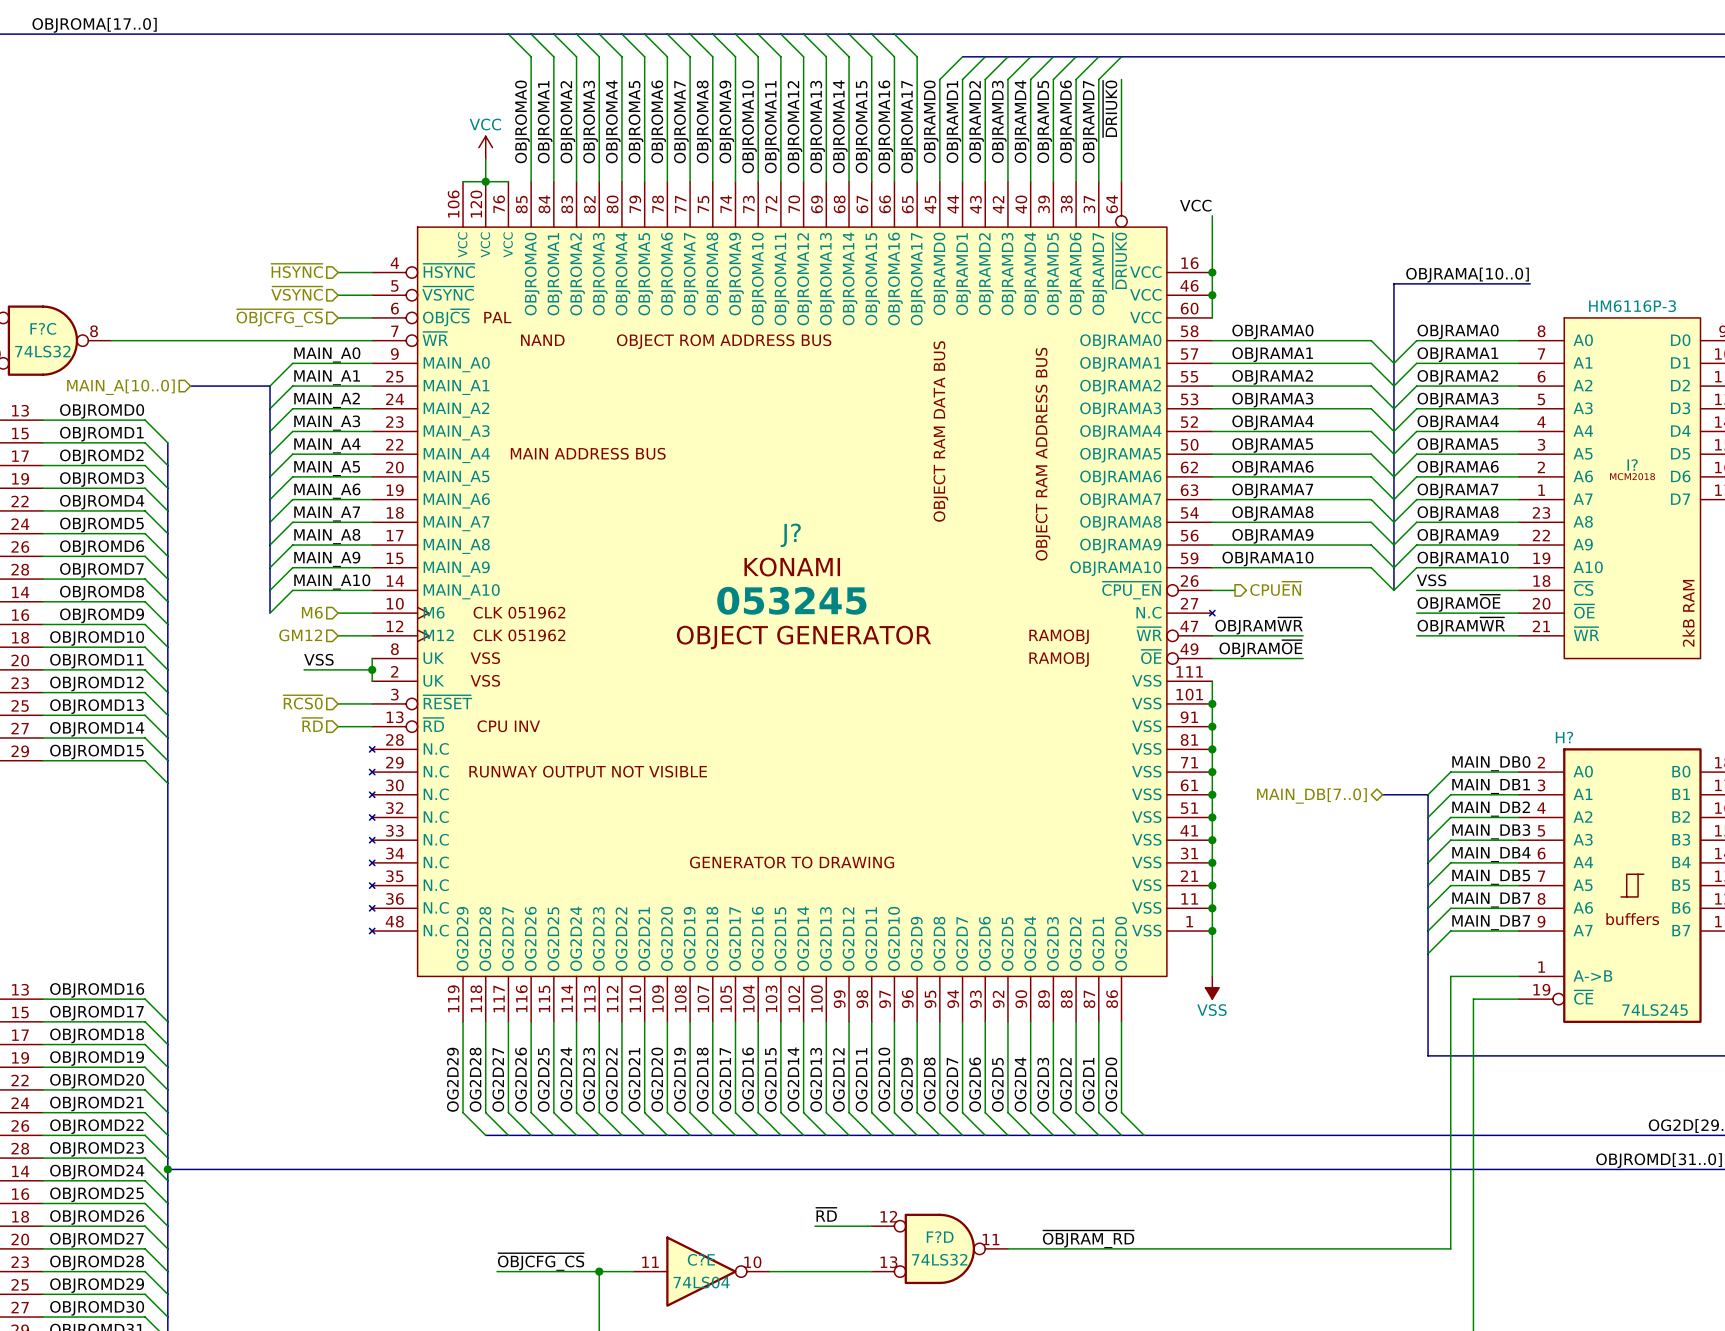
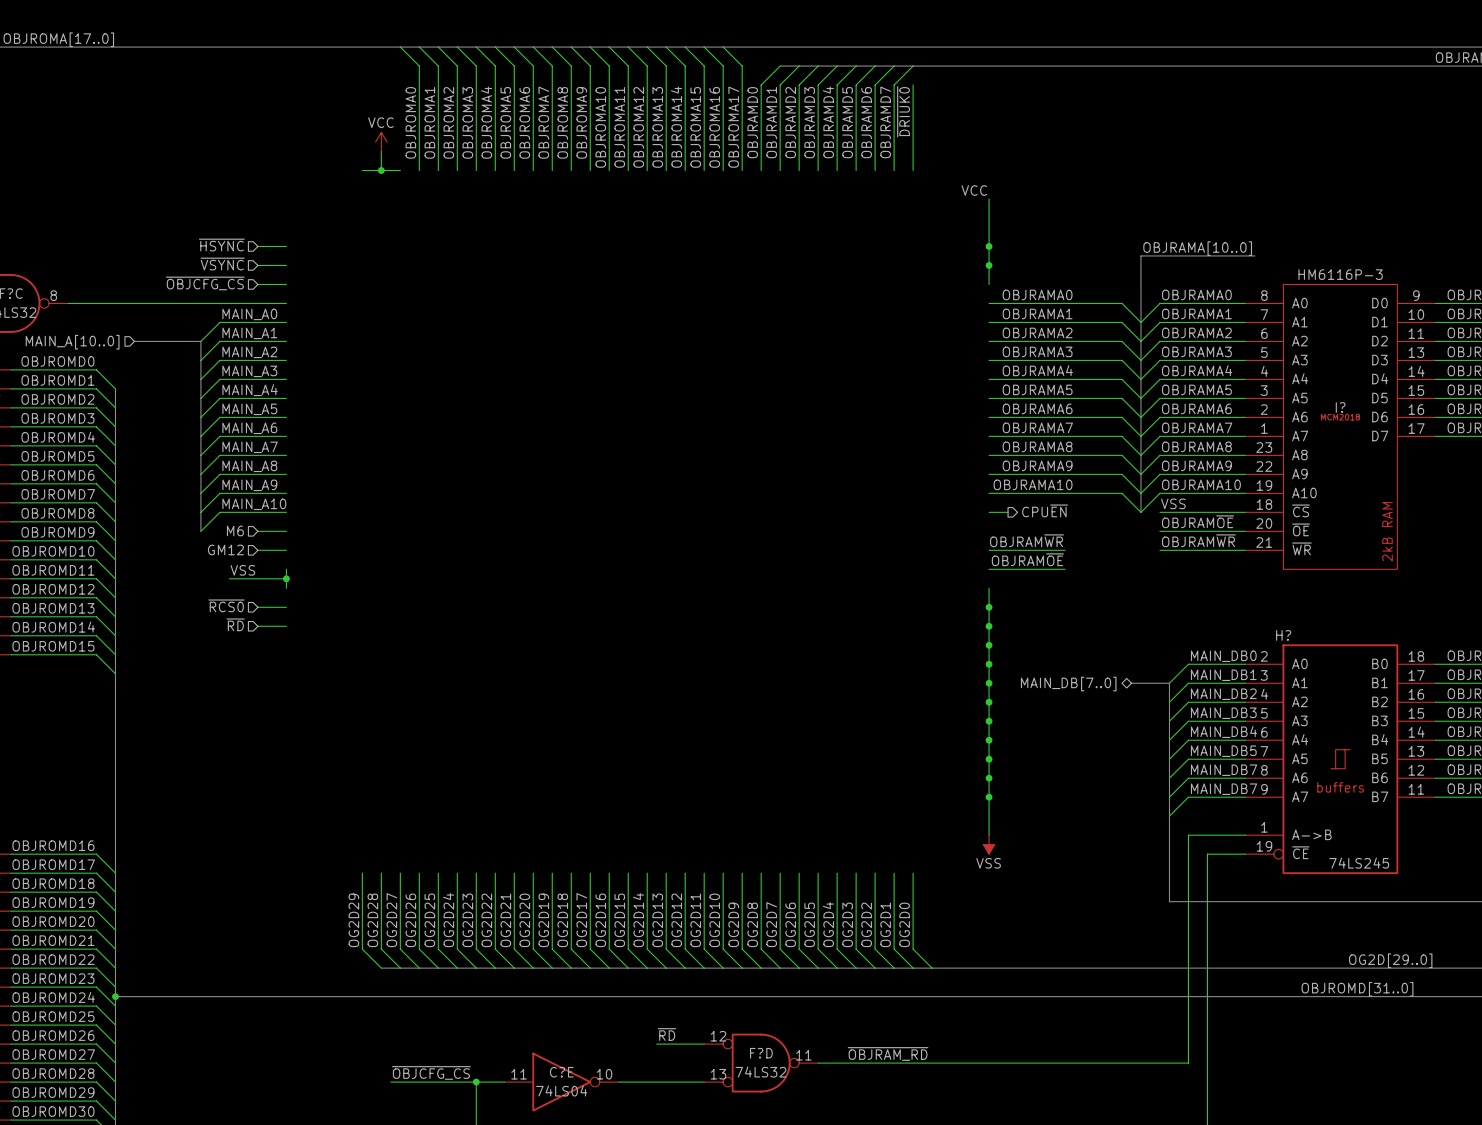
J?: 053245 (792, 601) -> none

